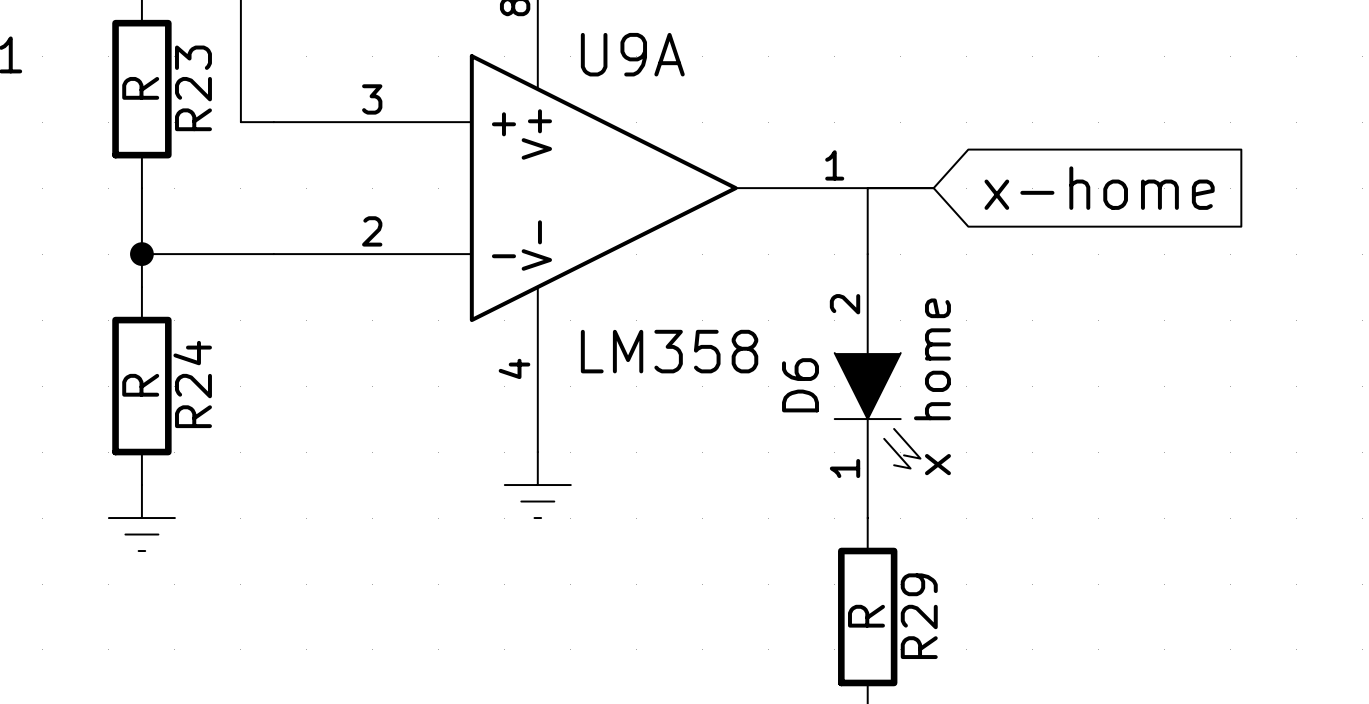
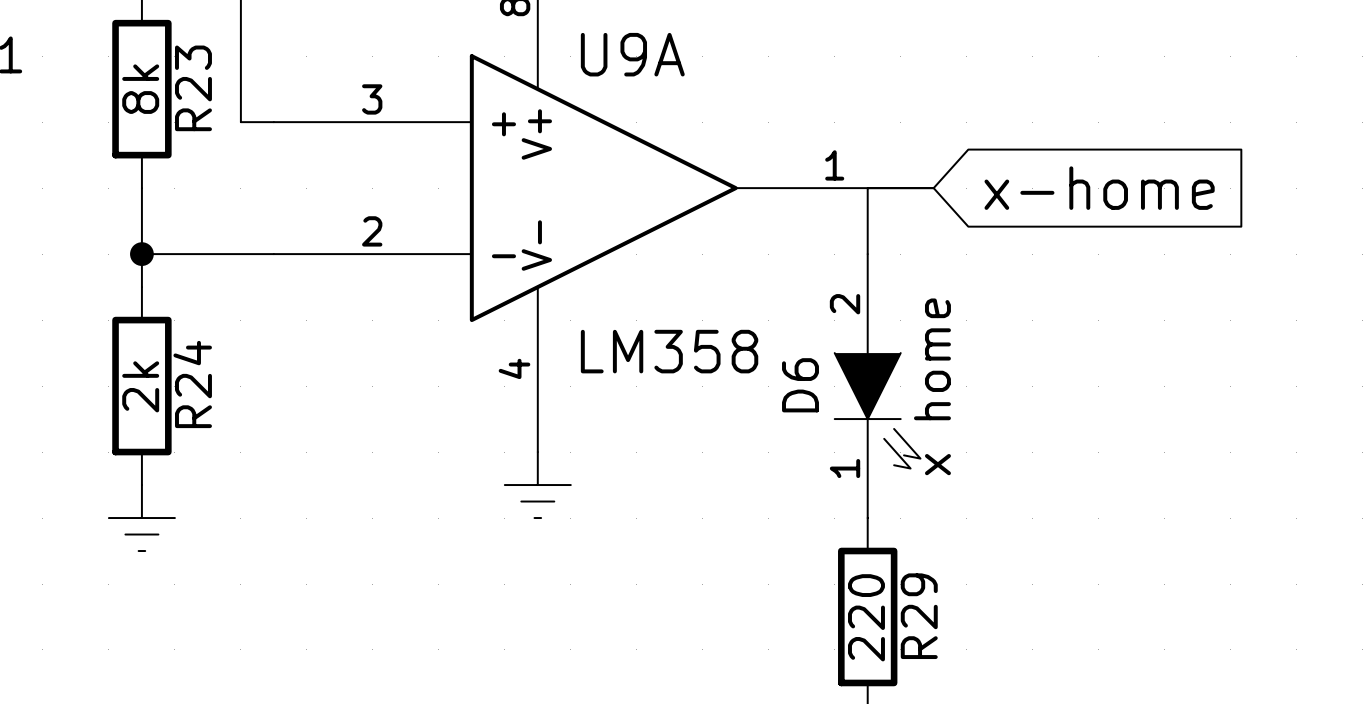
R23 value: R (140, 88) -> 8k (140, 89)
R24 value: R (140, 385) -> 2k (140, 386)
R29 value: R (866, 616) -> 220 (866, 617)

